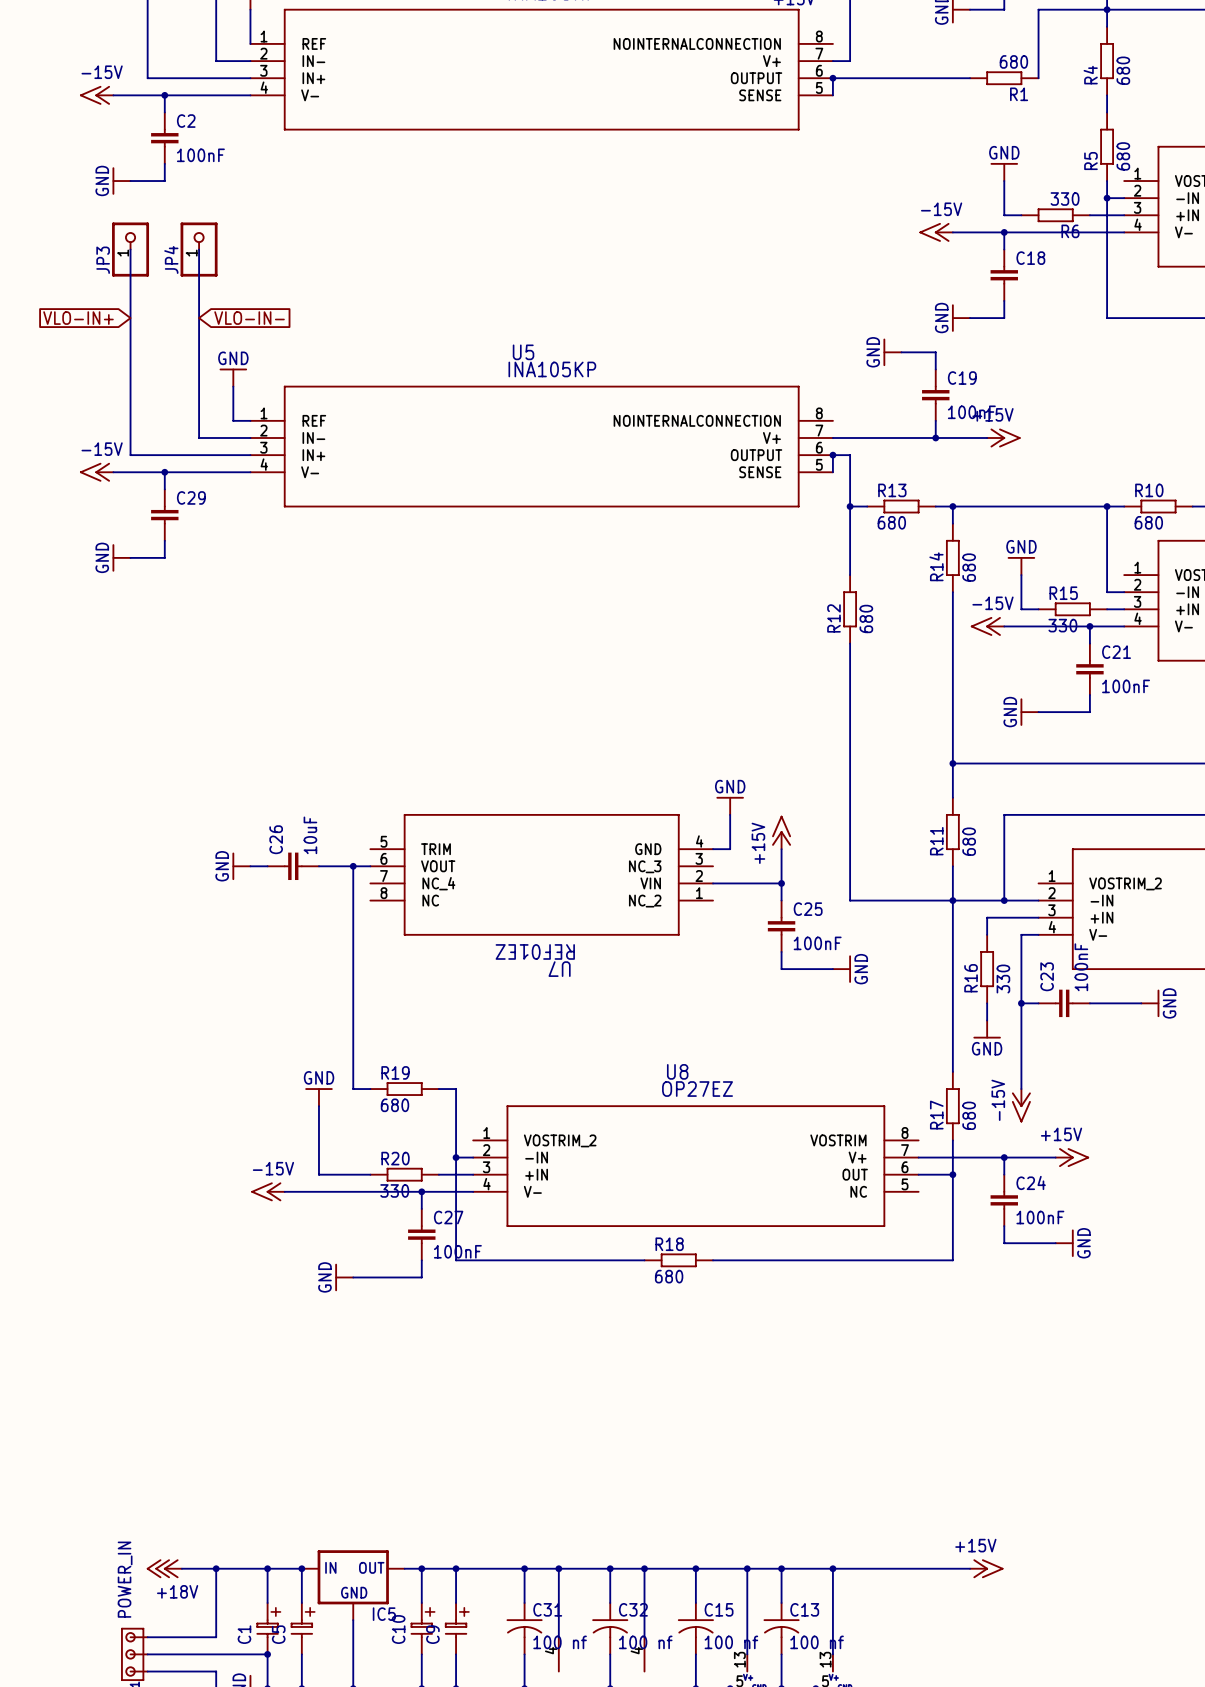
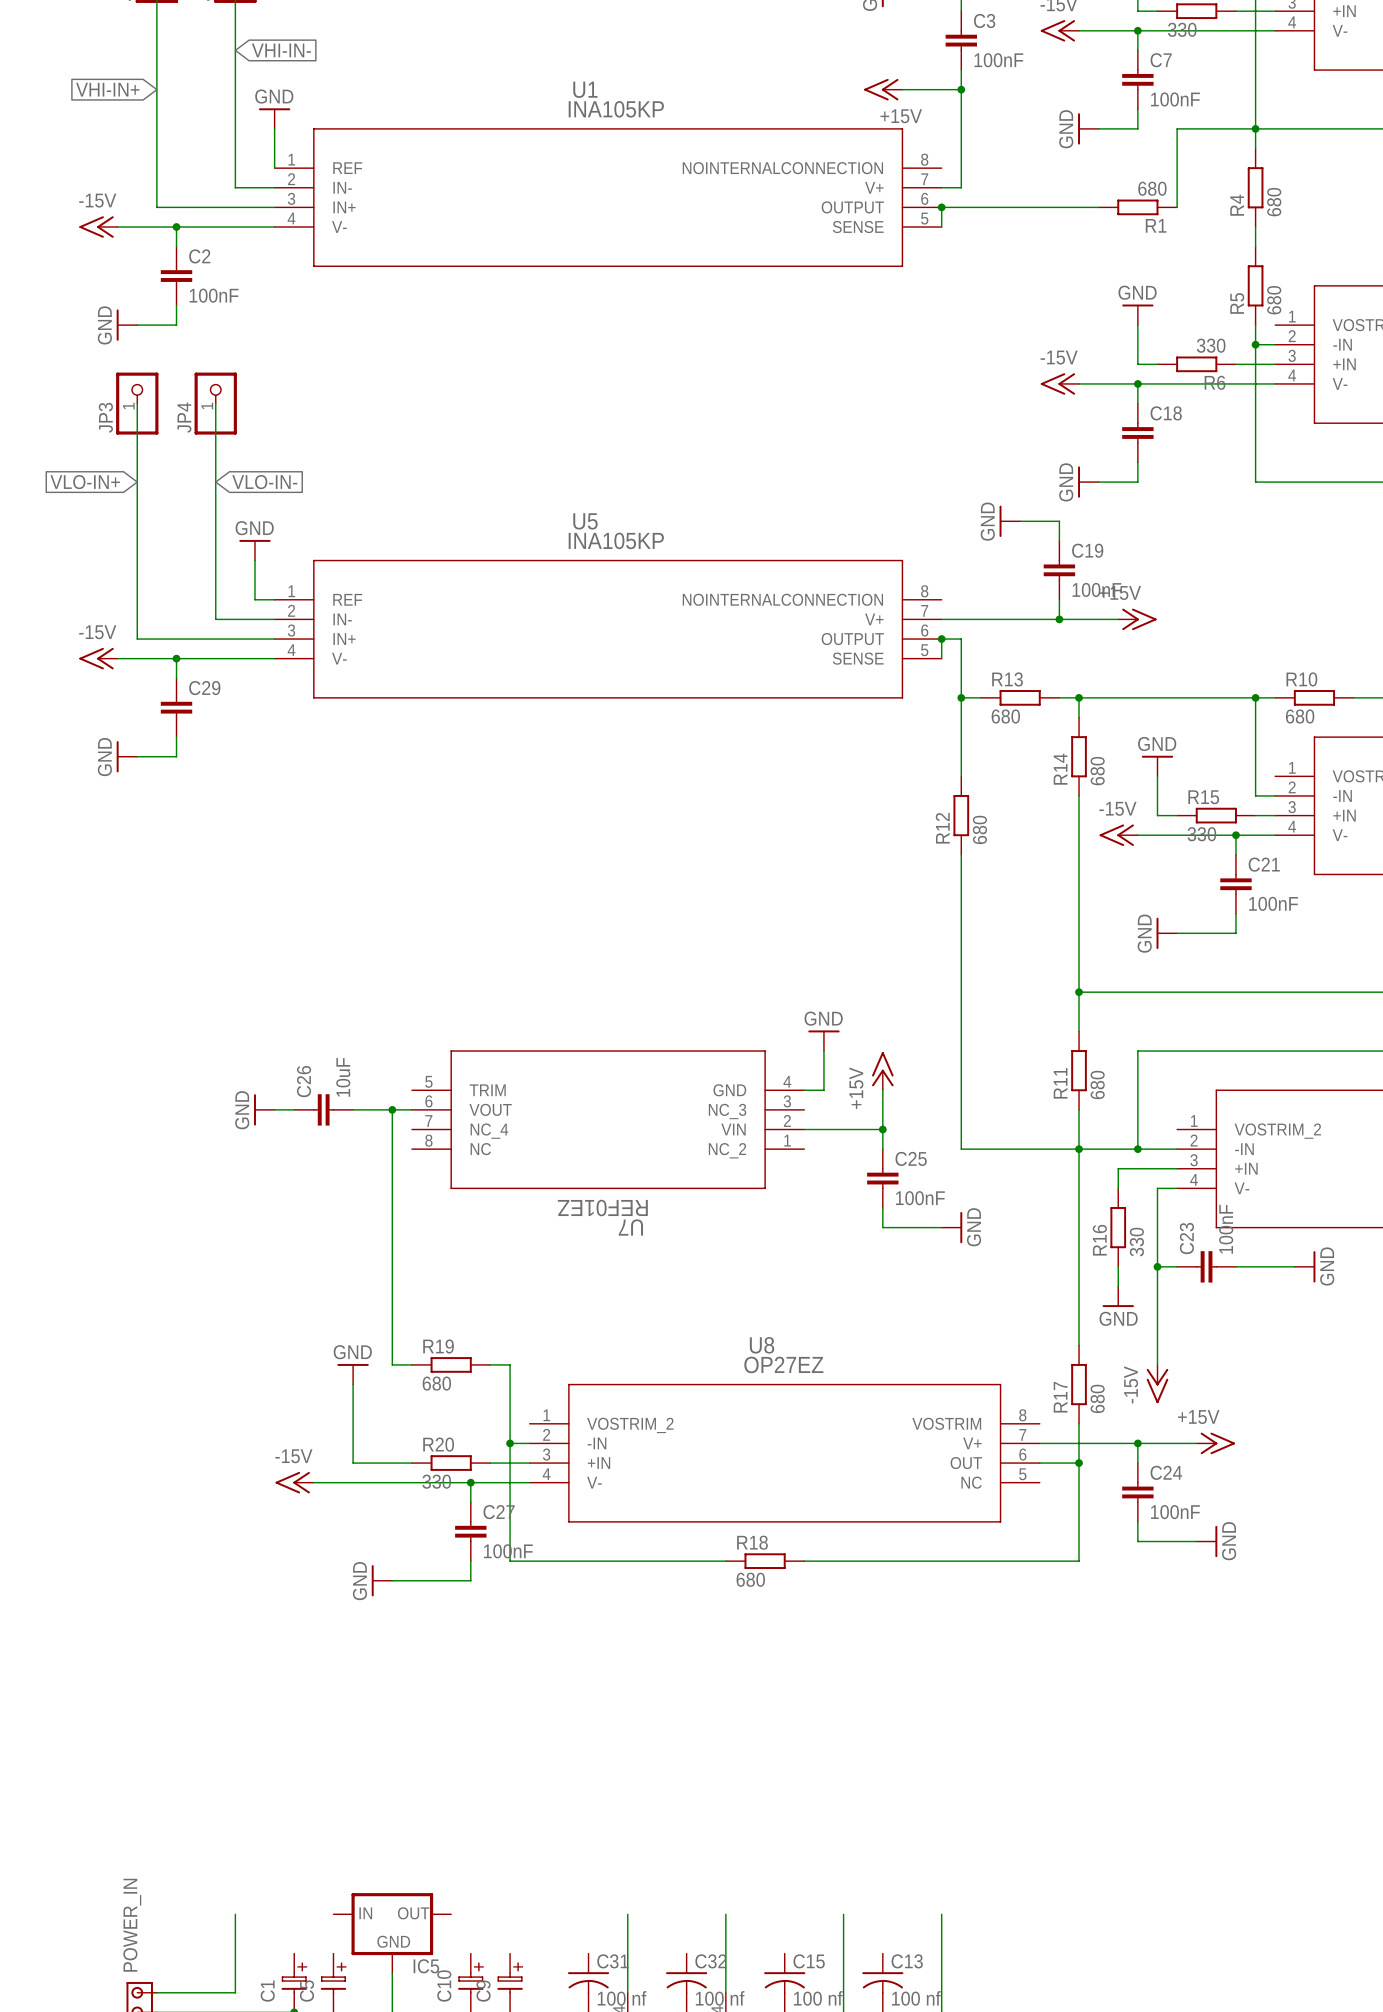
power symbol: +18V (164, 1568) -> none
wire: (181, 1568) (301, 1568) (301, 1602) -> none
junction: (216, 1568) -> none
wire: (267, 1568) (267, 1602) -> none
junction: (267, 1568) -> none
junction: (301, 1568) -> none
wire: (404, 1568) (970, 1568) -> none
wire: (421, 1568) (421, 1602) -> none
junction: (421, 1568) -> none
wire: (456, 1568) (456, 1602) -> none
junction: (456, 1568) -> none
wire: (524, 1568) (524, 1602) -> none
junction: (524, 1568) -> none
junction: (558, 1568) -> none
wire: (610, 1568) (610, 1602) -> none
junction: (610, 1568) -> none
junction: (644, 1568) -> none
wire: (695, 1568) (695, 1602) -> none
junction: (695, 1568) -> none
junction: (747, 1568) -> none
wire: (781, 1568) (781, 1602) -> none
junction: (781, 1568) -> none
junction: (832, 1568) -> none
power symbol: +15V (986, 1568) -> none

